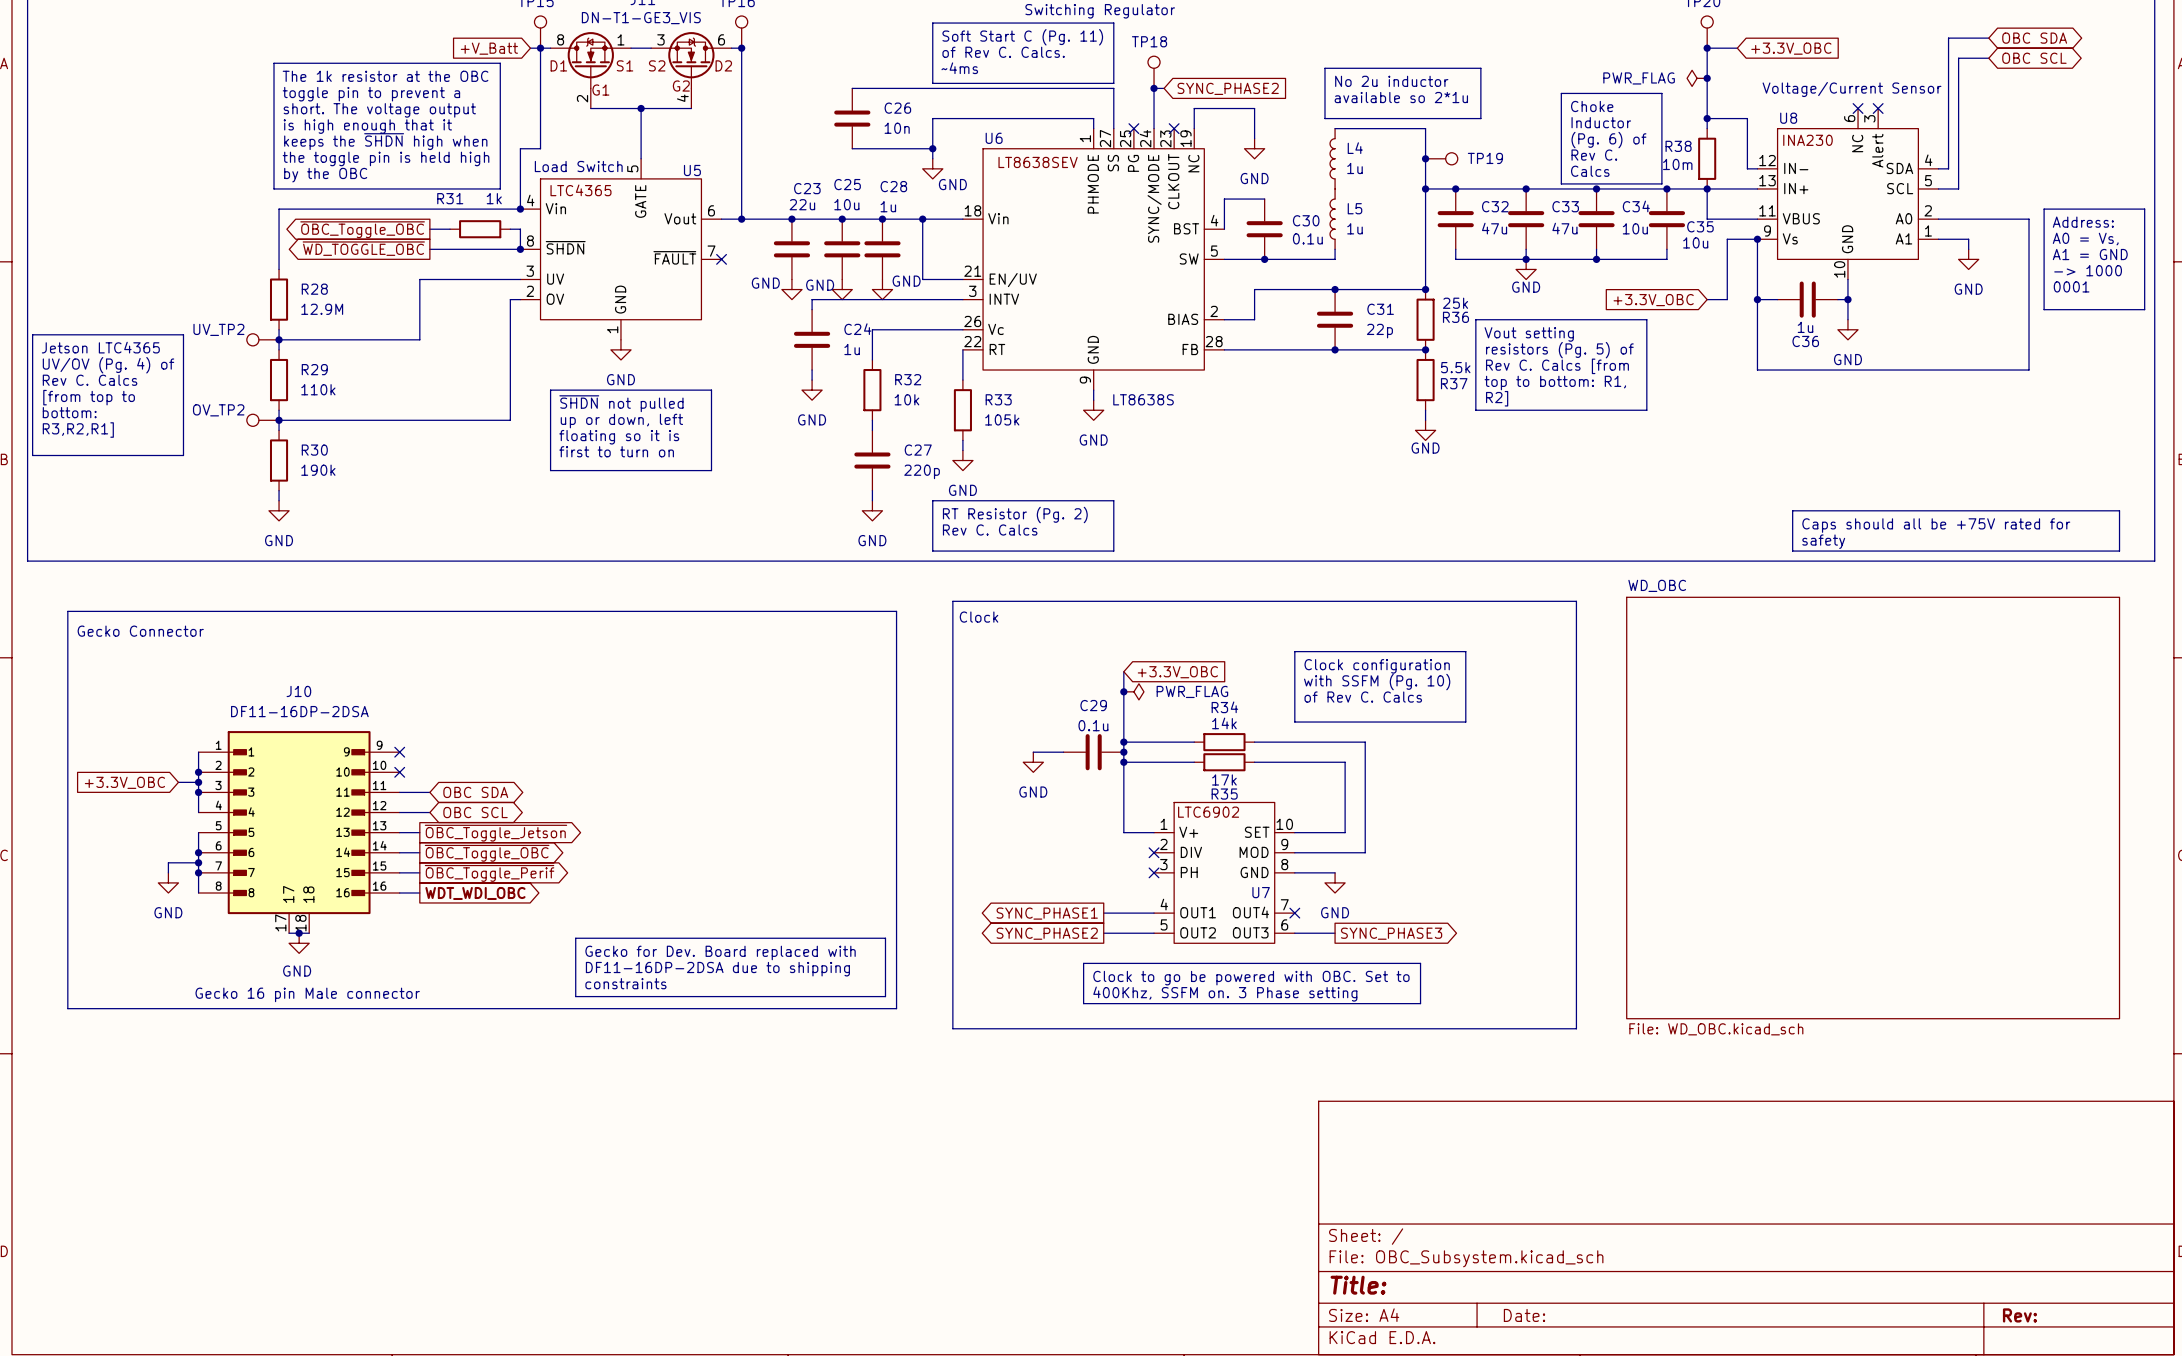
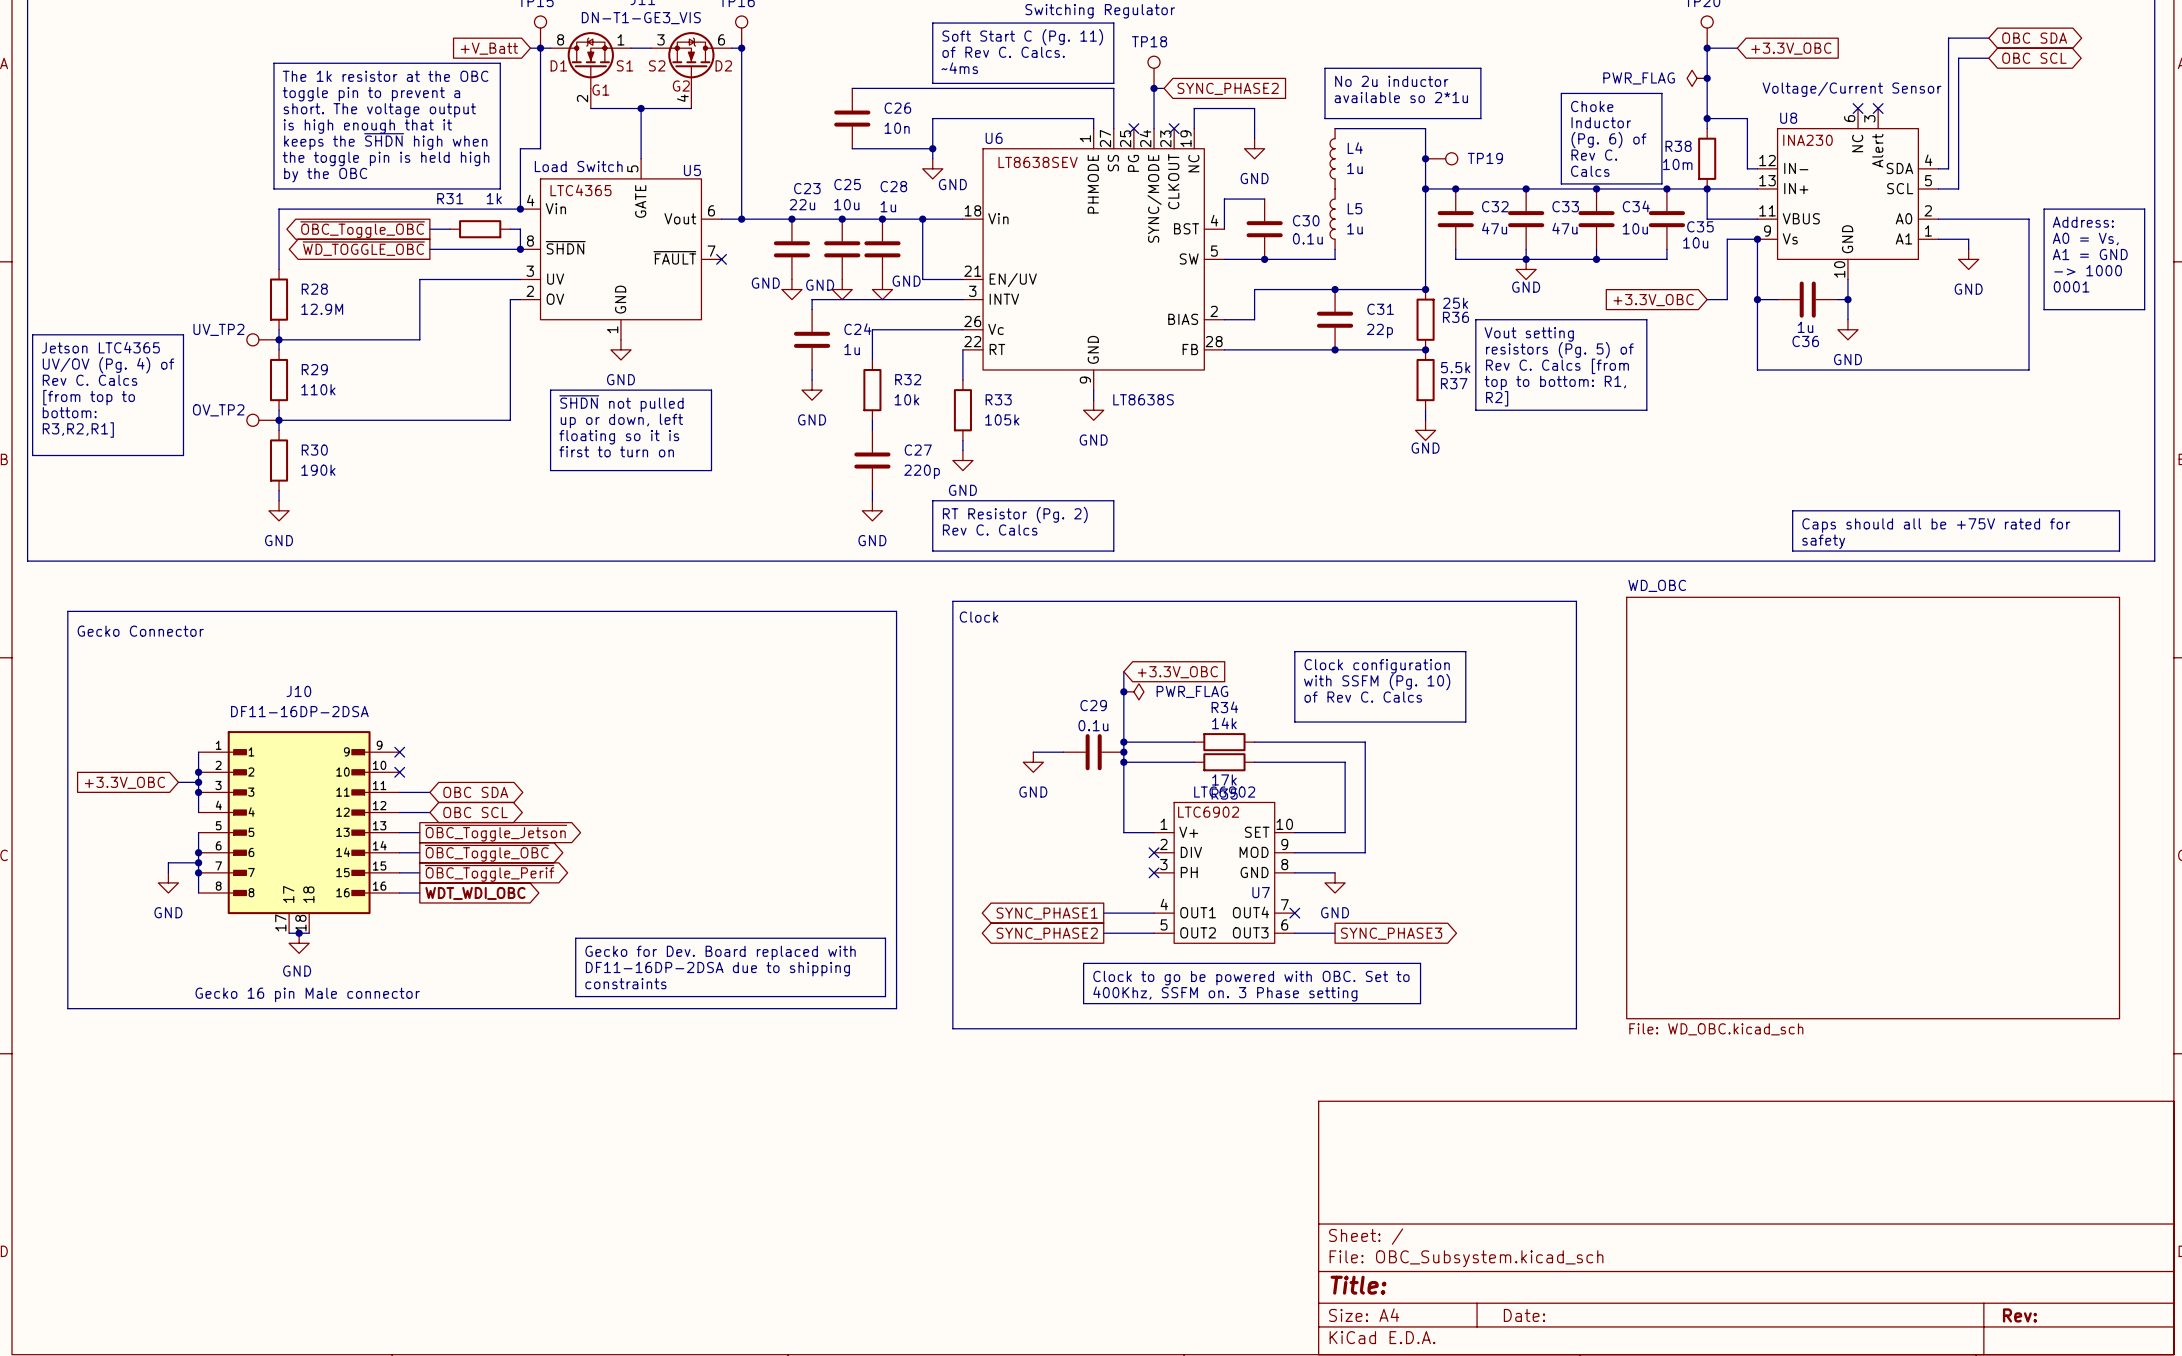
U7 value: none -> LTC6902 (1224, 792)

